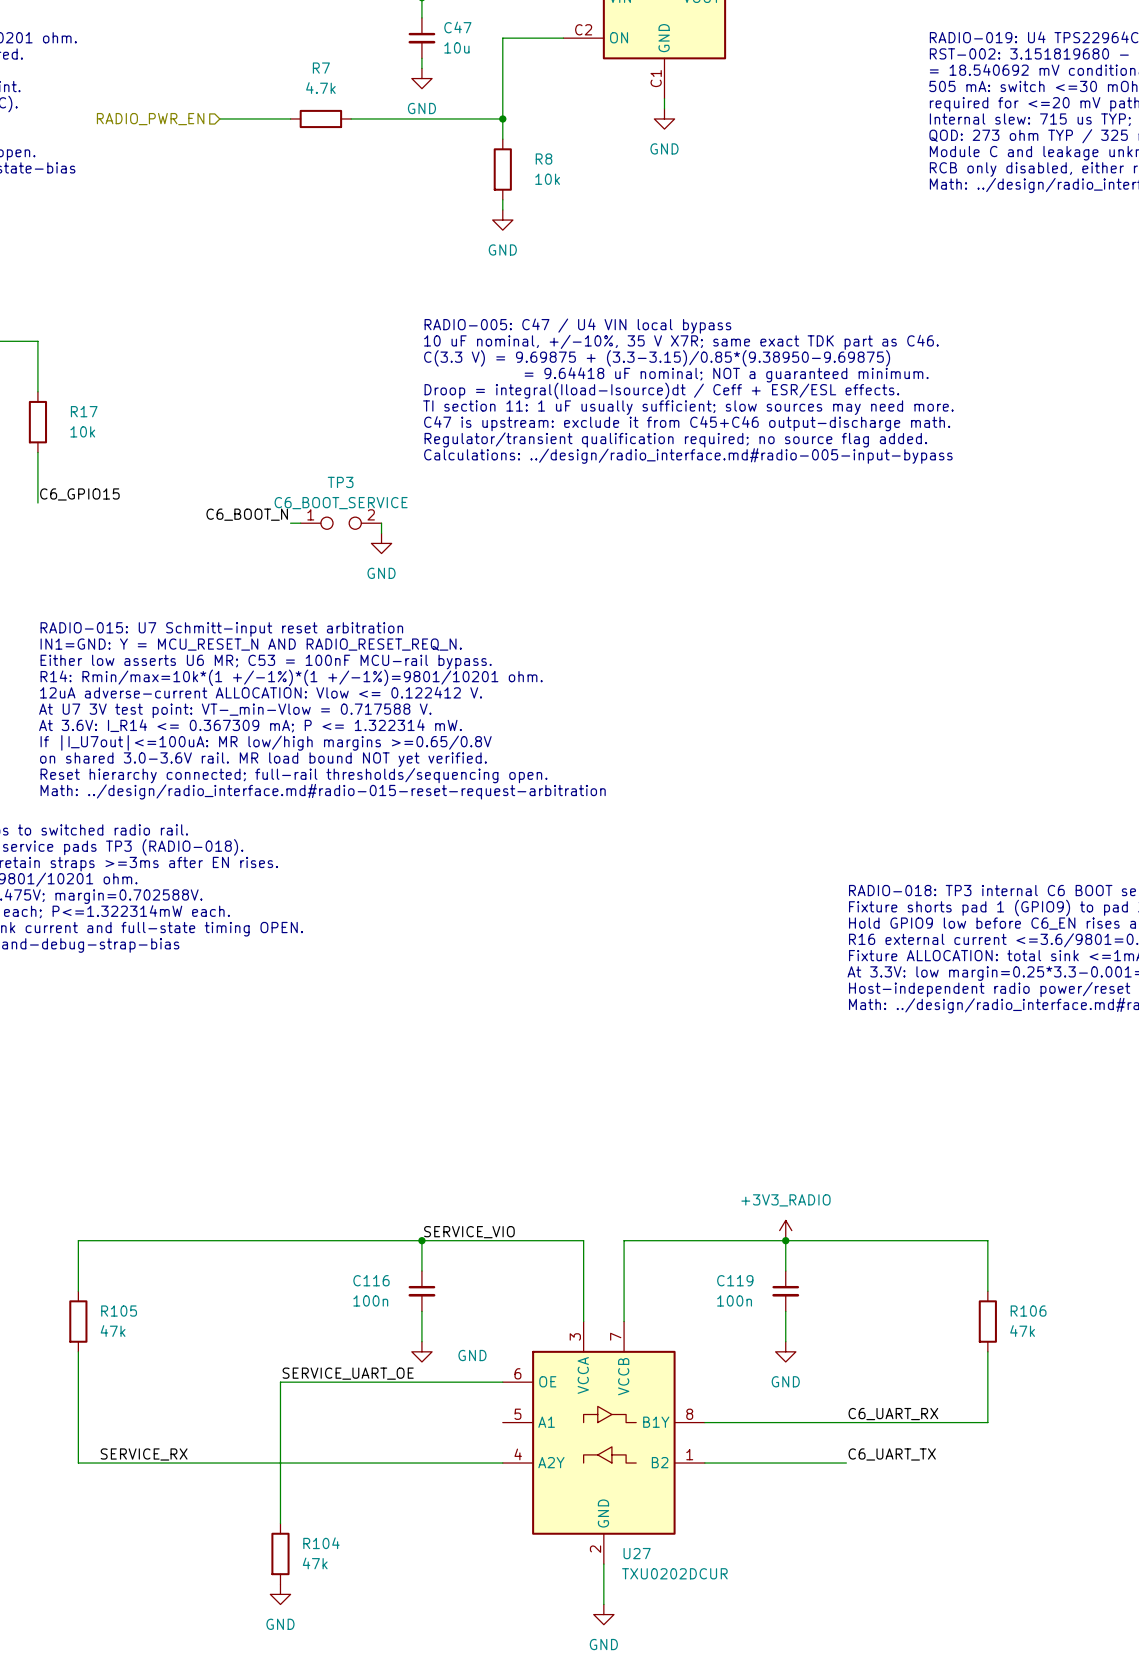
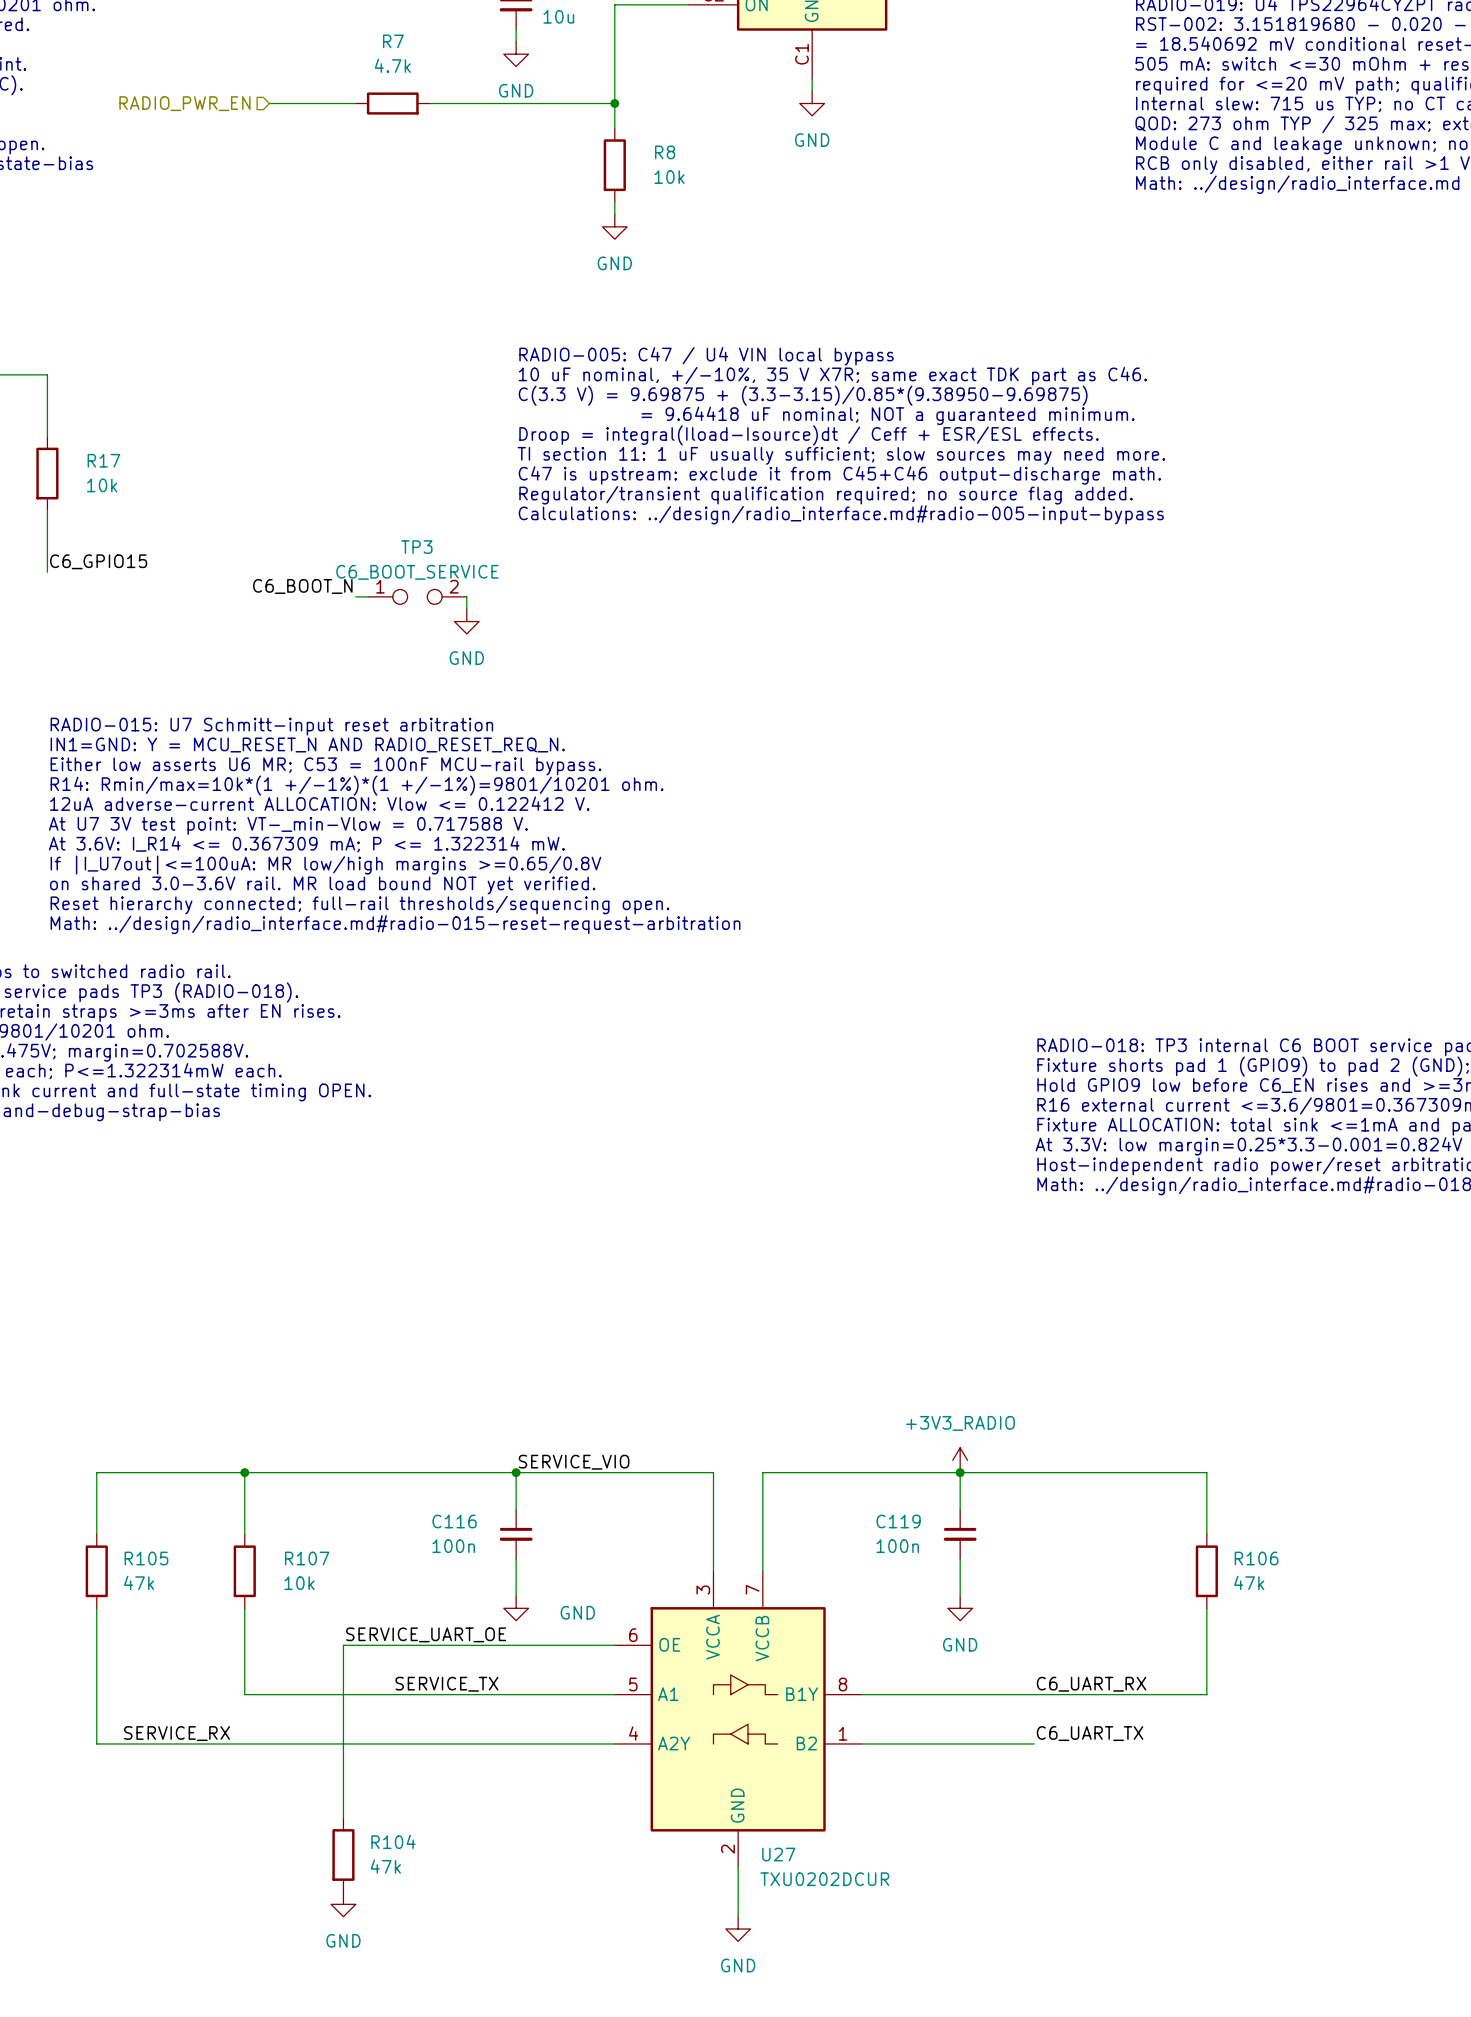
wire: none -> (244, 1472) (244, 1534)
junction: none -> (244, 1472)
R107: none -> 10k (244, 1571)
wire: none -> (244, 1608) (244, 1694) (614, 1694)
label: none -> SERVICE_TX (446, 1684)

